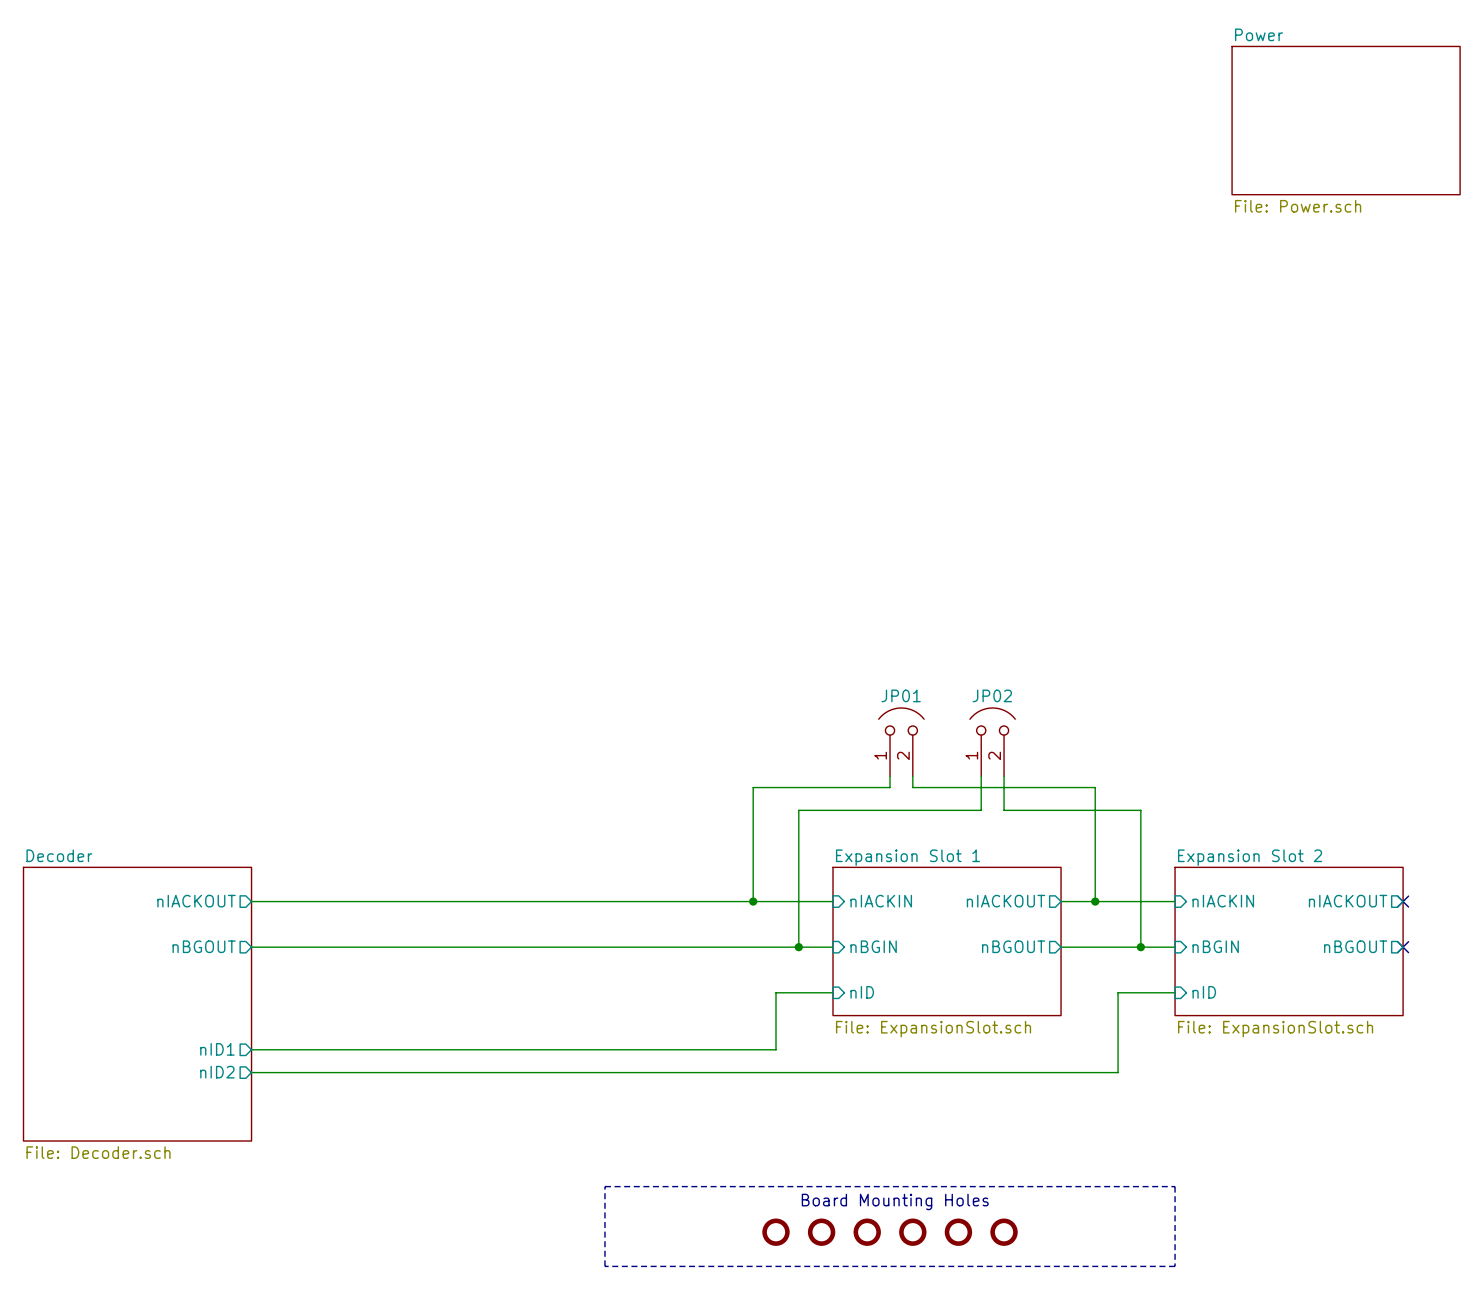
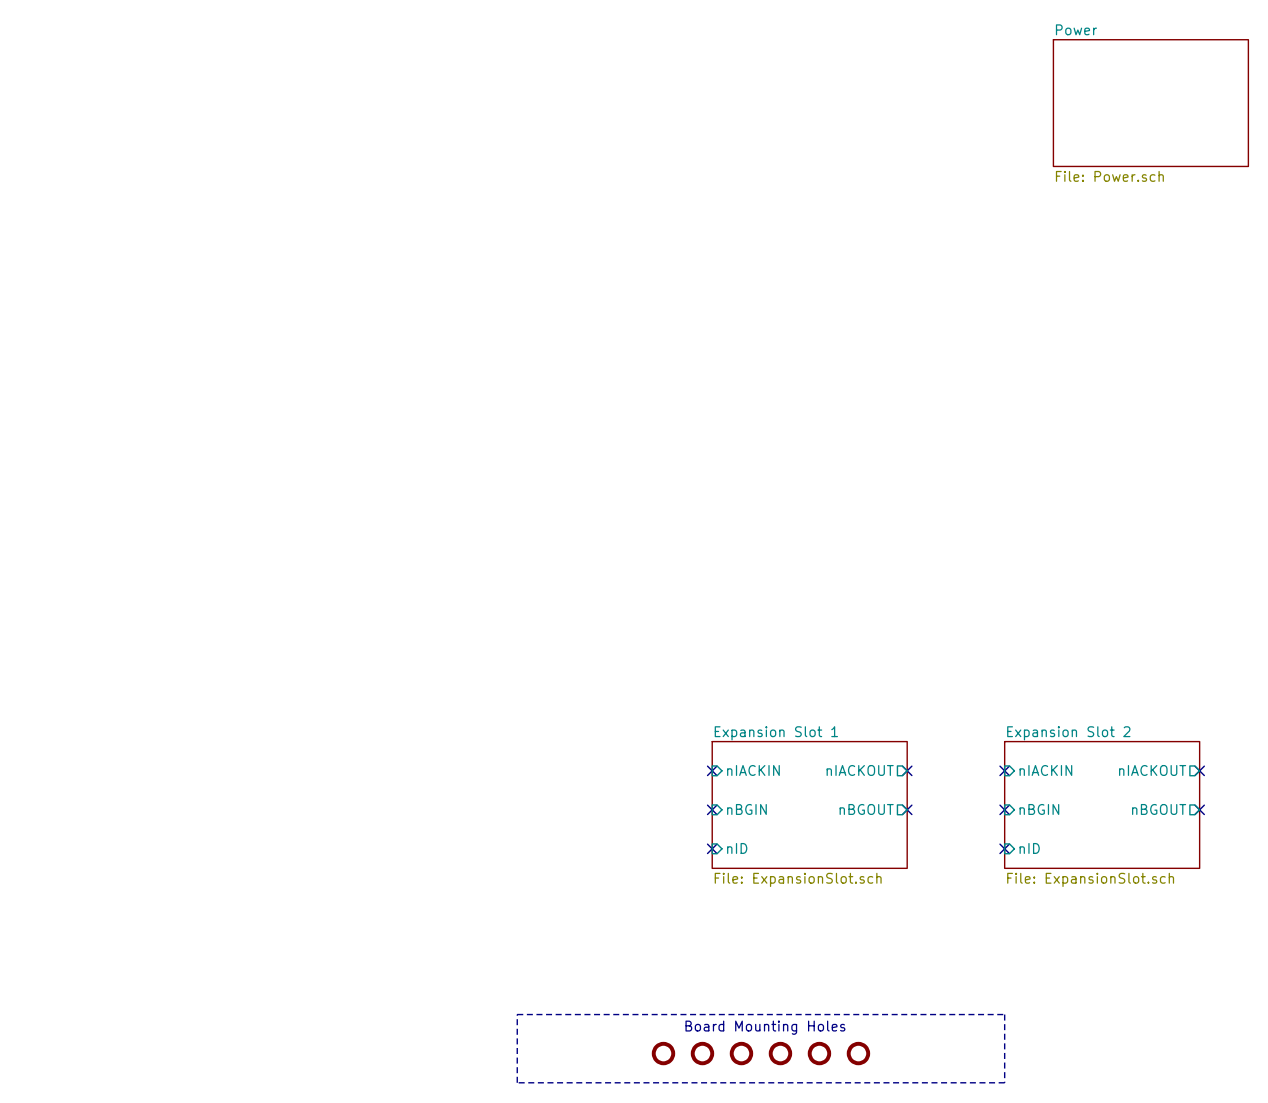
JP01: (901, 742) -> none
JP02: (992, 742) -> none
wire: (890, 776) (890, 787) (753, 787) (753, 901) -> none
wire: (912, 776) (912, 787) (1095, 787) (1095, 901) -> none
wire: (981, 776) (981, 810) (798, 810) (798, 947) -> none
wire: (1004, 776) (1004, 810) (1140, 810) (1140, 947) -> none
sheet pin: nIACKOUT (196, 901) -> none
wire: (251, 901) (833, 901) -> none
junction: (753, 901) -> none
no-connect mark: none -> (712, 770)
wire: (1061, 901) (1175, 901) -> none
no-connect mark: none -> (907, 770)
junction: (1095, 901) -> none
no-connect mark: none -> (1004, 770)
sheet pin: nBGOUT (204, 946) -> none
wire: (251, 947) (833, 947) -> none
junction: (798, 947) -> none
no-connect mark: none -> (712, 809)
wire: (1061, 947) (1175, 947) -> none
no-connect mark: none -> (907, 809)
junction: (1140, 947) -> none
no-connect mark: none -> (1004, 809)
wire: (833, 992) (775, 992) (775, 1049) (251, 1049) -> none
no-connect mark: none -> (712, 848)
wire: (1175, 992) (1118, 992) (1118, 1072) (251, 1072) -> none
no-connect mark: none -> (1004, 848)
sheet Decoder: File: Decoder.sch (137, 1004) -> none
sheet pin: nID1 (217, 1049) -> none
sheet pin: nID2 (217, 1072) -> none

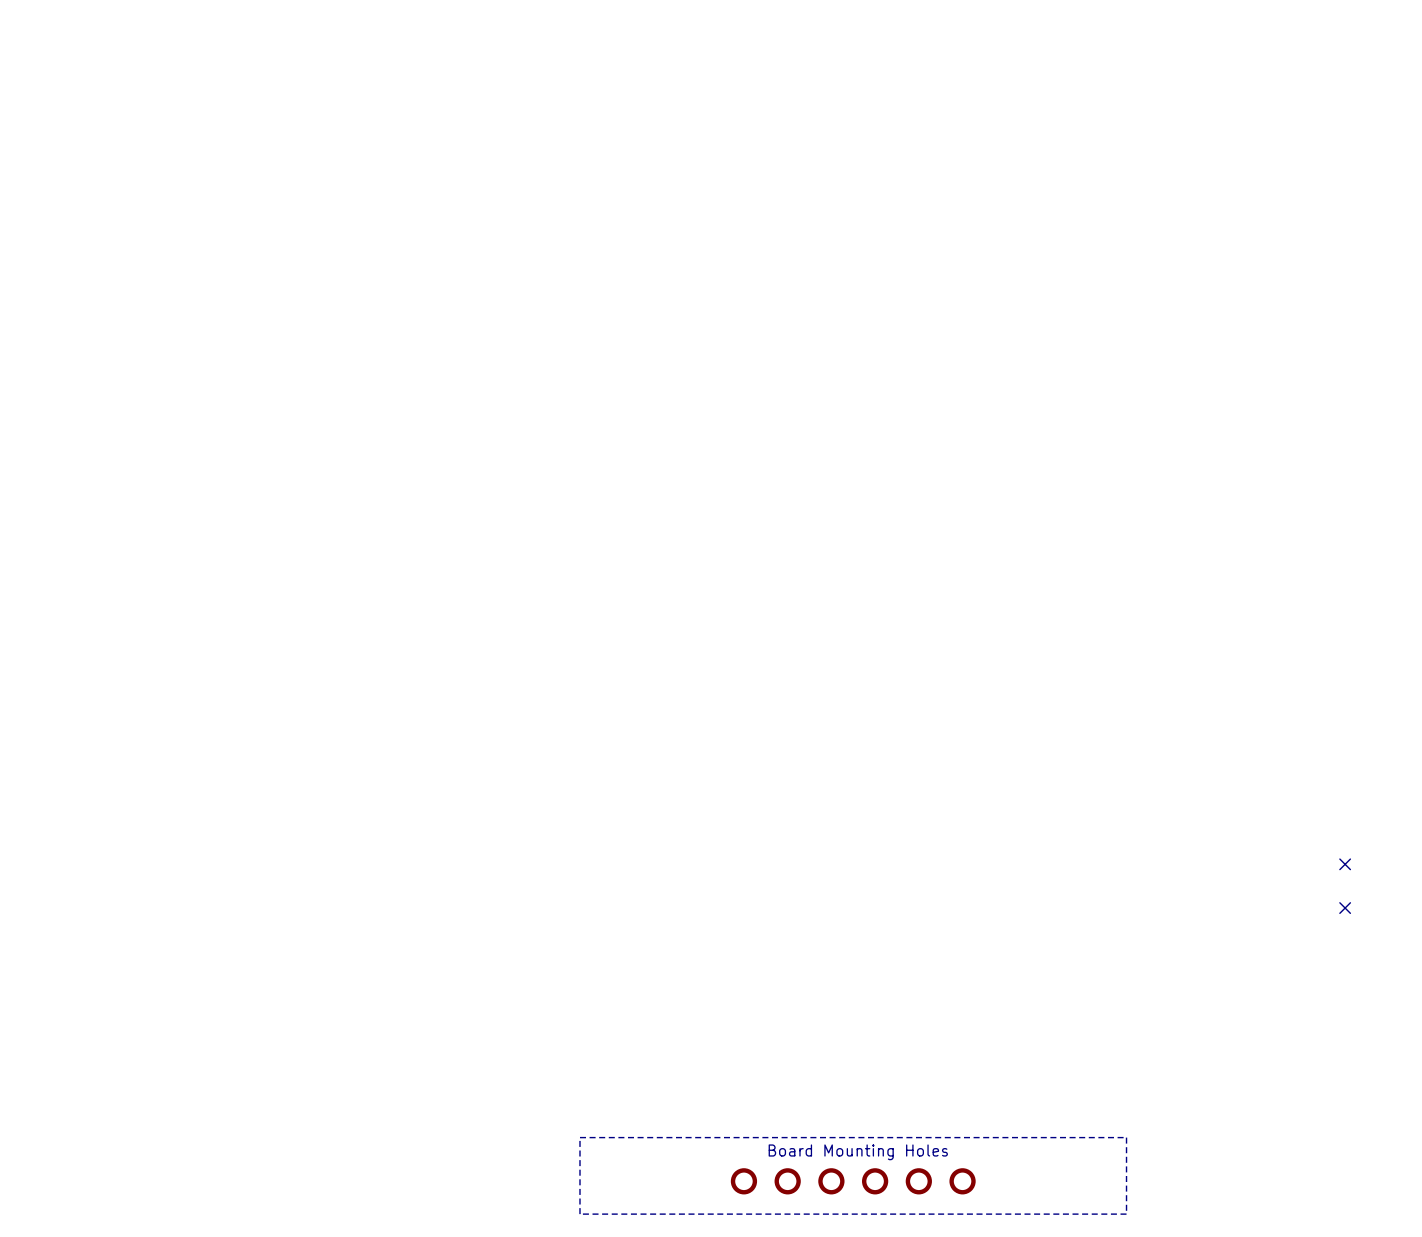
sheet Power: File: Power.sch (1150, 103) -> none
no-connect mark: (712, 770) -> none
sheet pin: nIACKIN (753, 770) -> none
sheet pin: nIACKOUT (860, 770) -> none
no-connect mark: (907, 770) -> none
no-connect mark: (1004, 770) -> none
sheet pin: nIACKIN (1045, 770) -> none
sheet pin: nIACKOUT (1152, 770) -> none
sheet Expansion Slot 1: File: ExpansionSlot.sch (809, 804) -> none
sheet Expansion Slot 2: File: ExpansionSlot.sch (1102, 804) -> none
no-connect mark: (712, 809) -> none
sheet pin: nBGIN (746, 809) -> none
sheet pin: nBGOUT (866, 809) -> none
no-connect mark: (907, 809) -> none
no-connect mark: (1004, 809) -> none
sheet pin: nBGIN (1039, 809) -> none
sheet pin: nBGOUT (1159, 809) -> none
no-connect mark: (712, 848) -> none
sheet pin: nID (737, 848) -> none
no-connect mark: (1004, 848) -> none
sheet pin: nID (1029, 848) -> none

